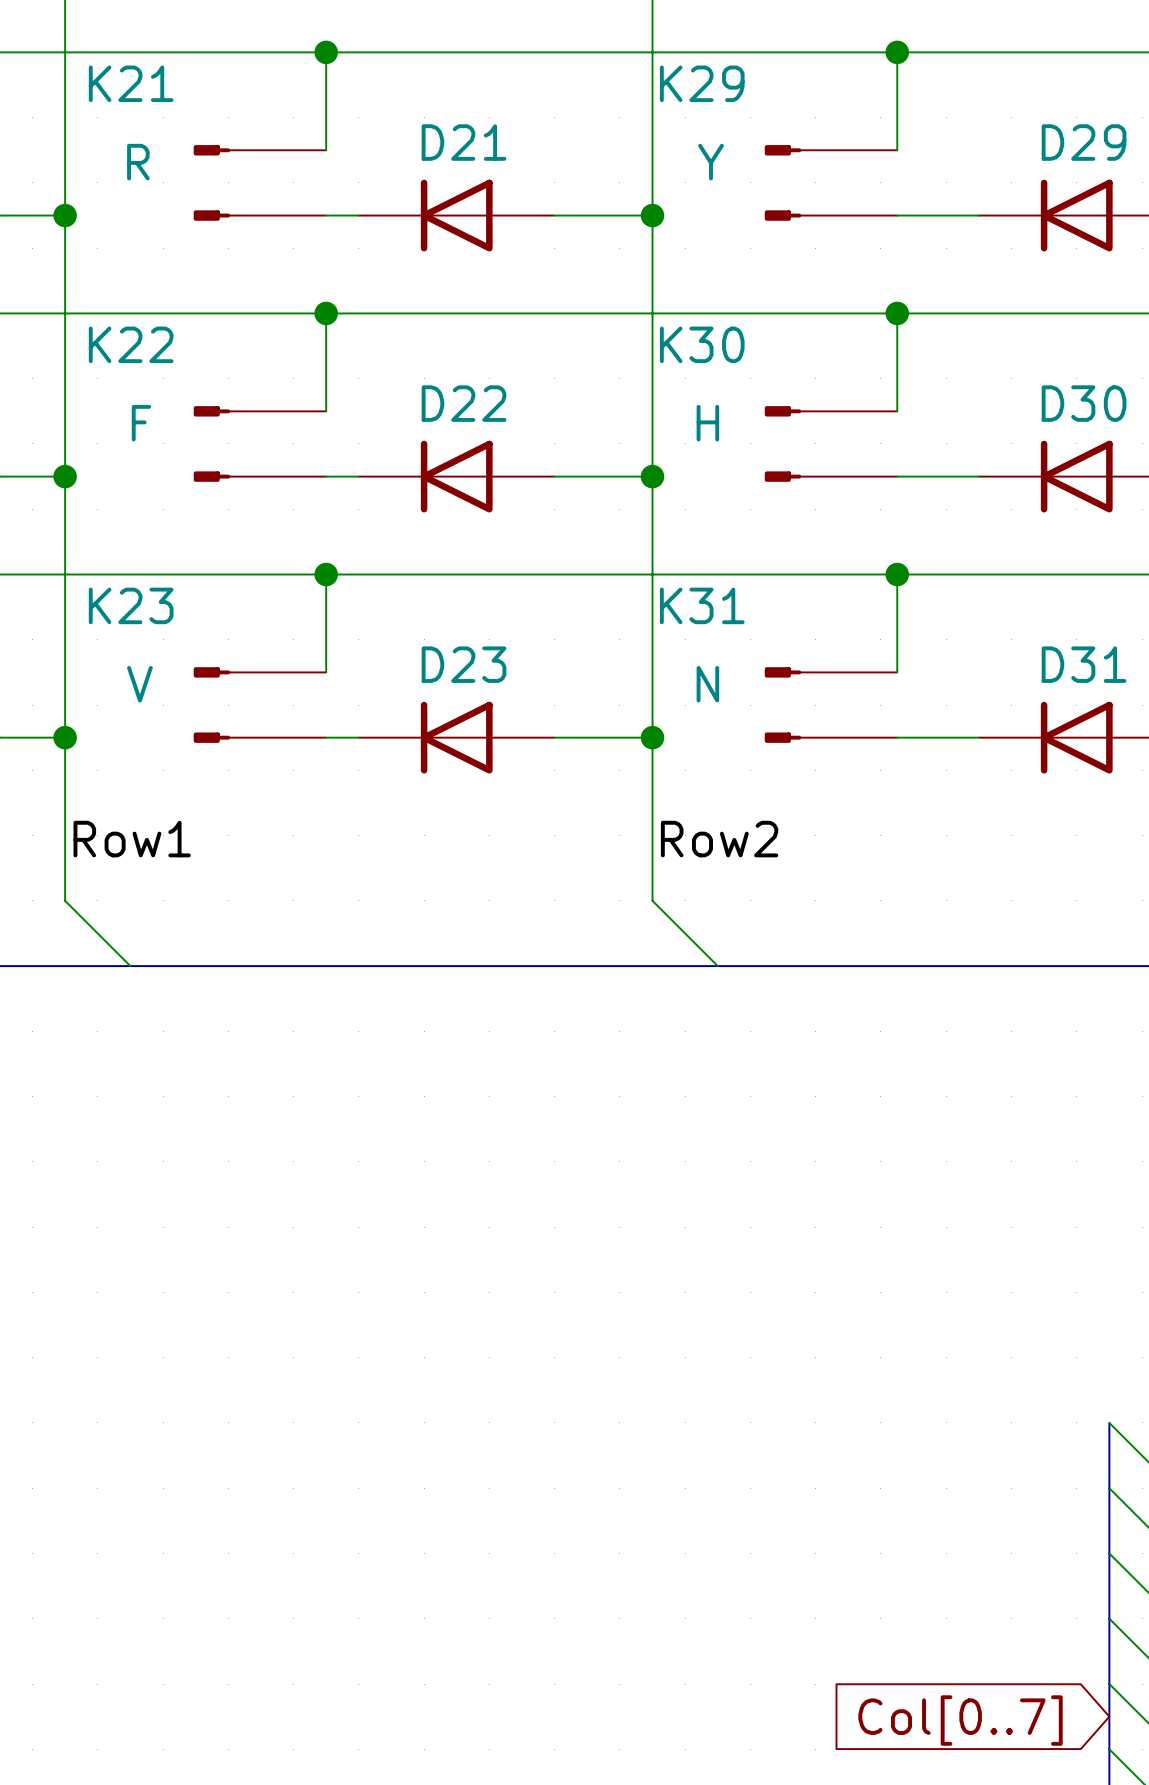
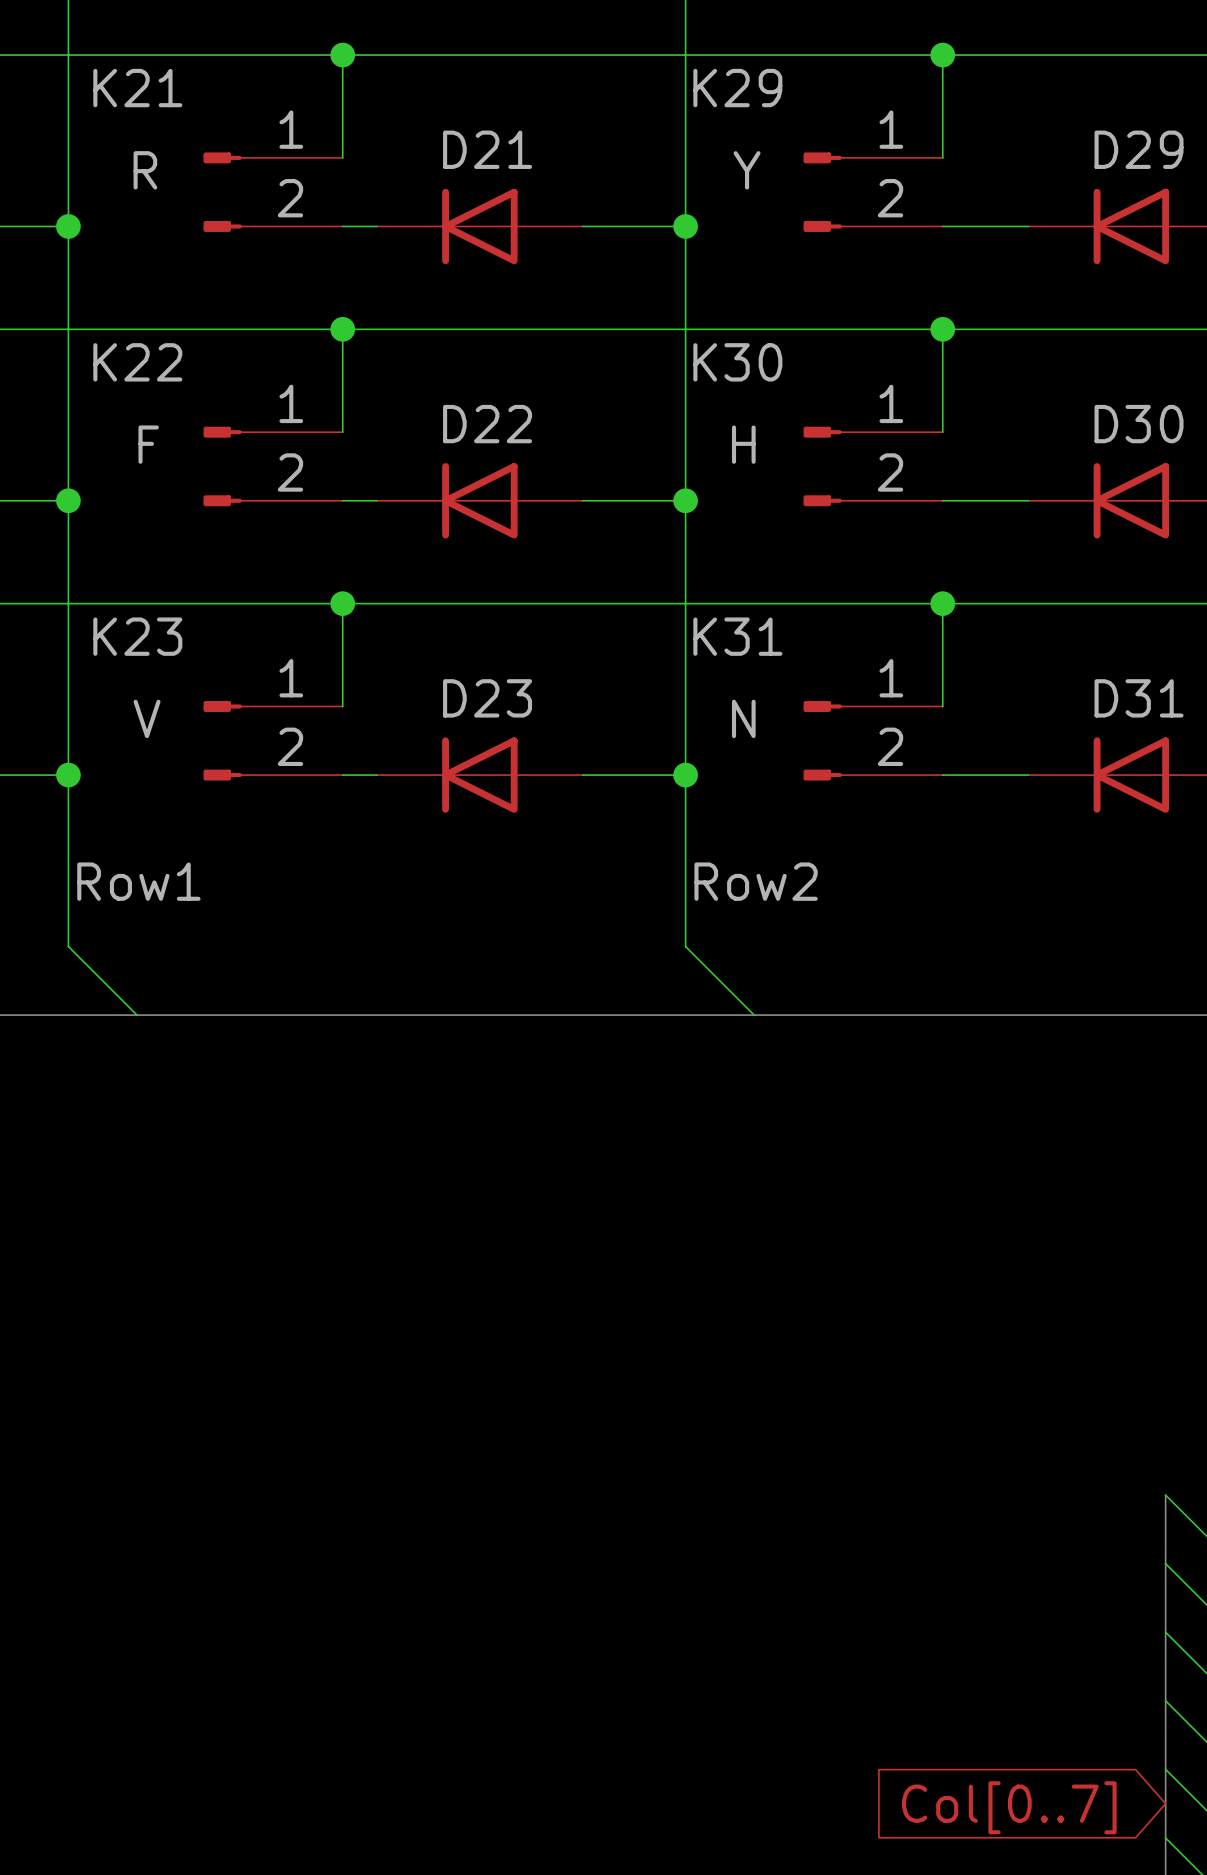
K21 pin number: none -> 1 (291, 129)
K29 pin number: none -> 1 (891, 129)
K21 pin number: none -> 2 (290, 198)
K29 pin number: none -> 2 (890, 198)
K22 pin number: none -> 1 (291, 403)
K30 pin number: none -> 1 (891, 403)
K22 pin number: none -> 2 (290, 472)
K30 pin number: none -> 2 (890, 472)
K23 pin number: none -> 1 (291, 678)
K31 pin number: none -> 1 (891, 678)
K23 pin number: none -> 2 (290, 746)
K31 pin number: none -> 2 (890, 746)

